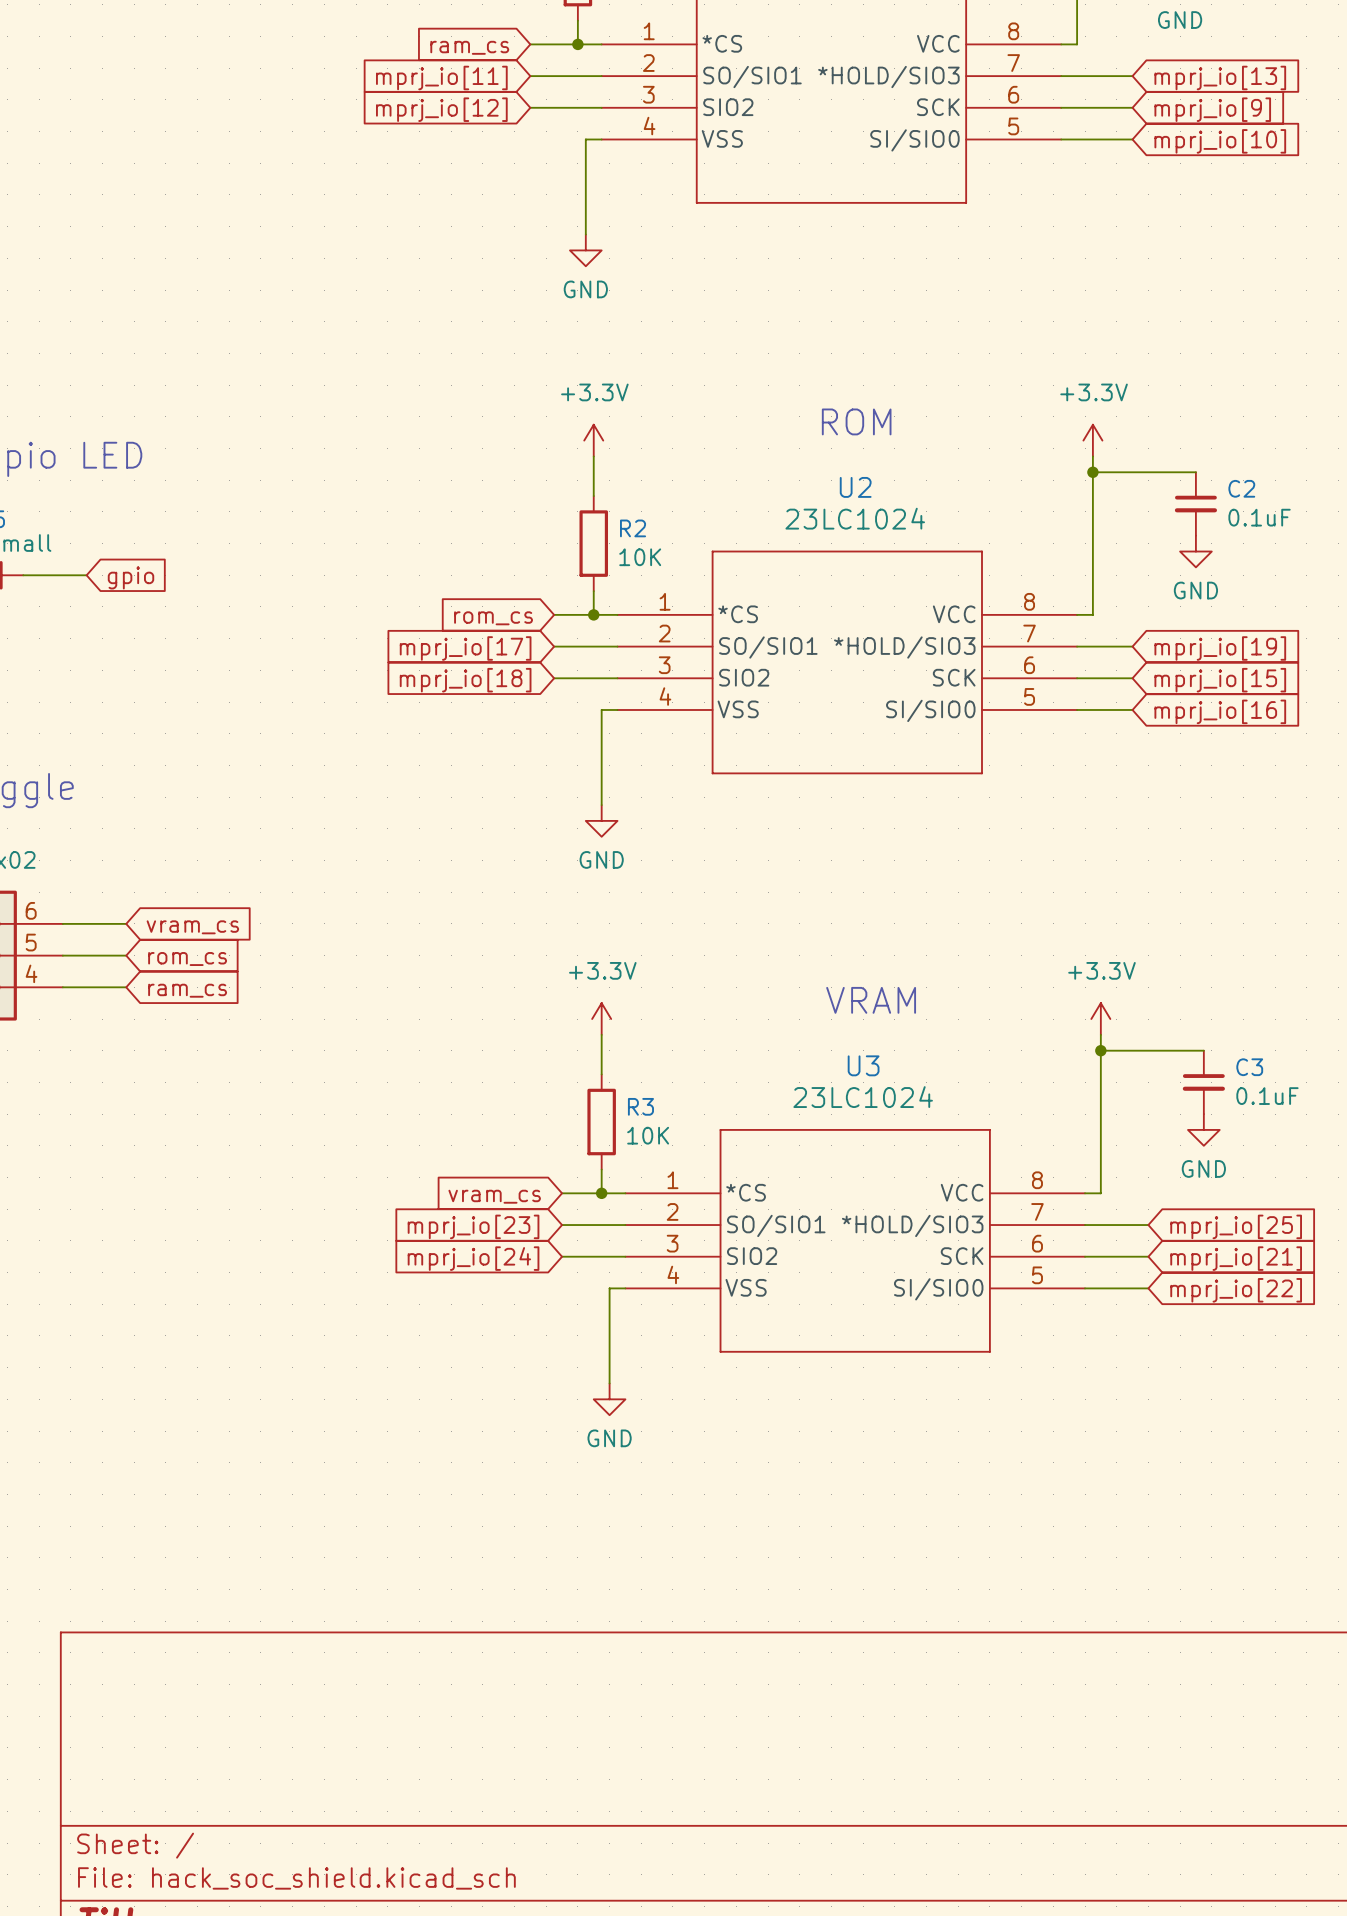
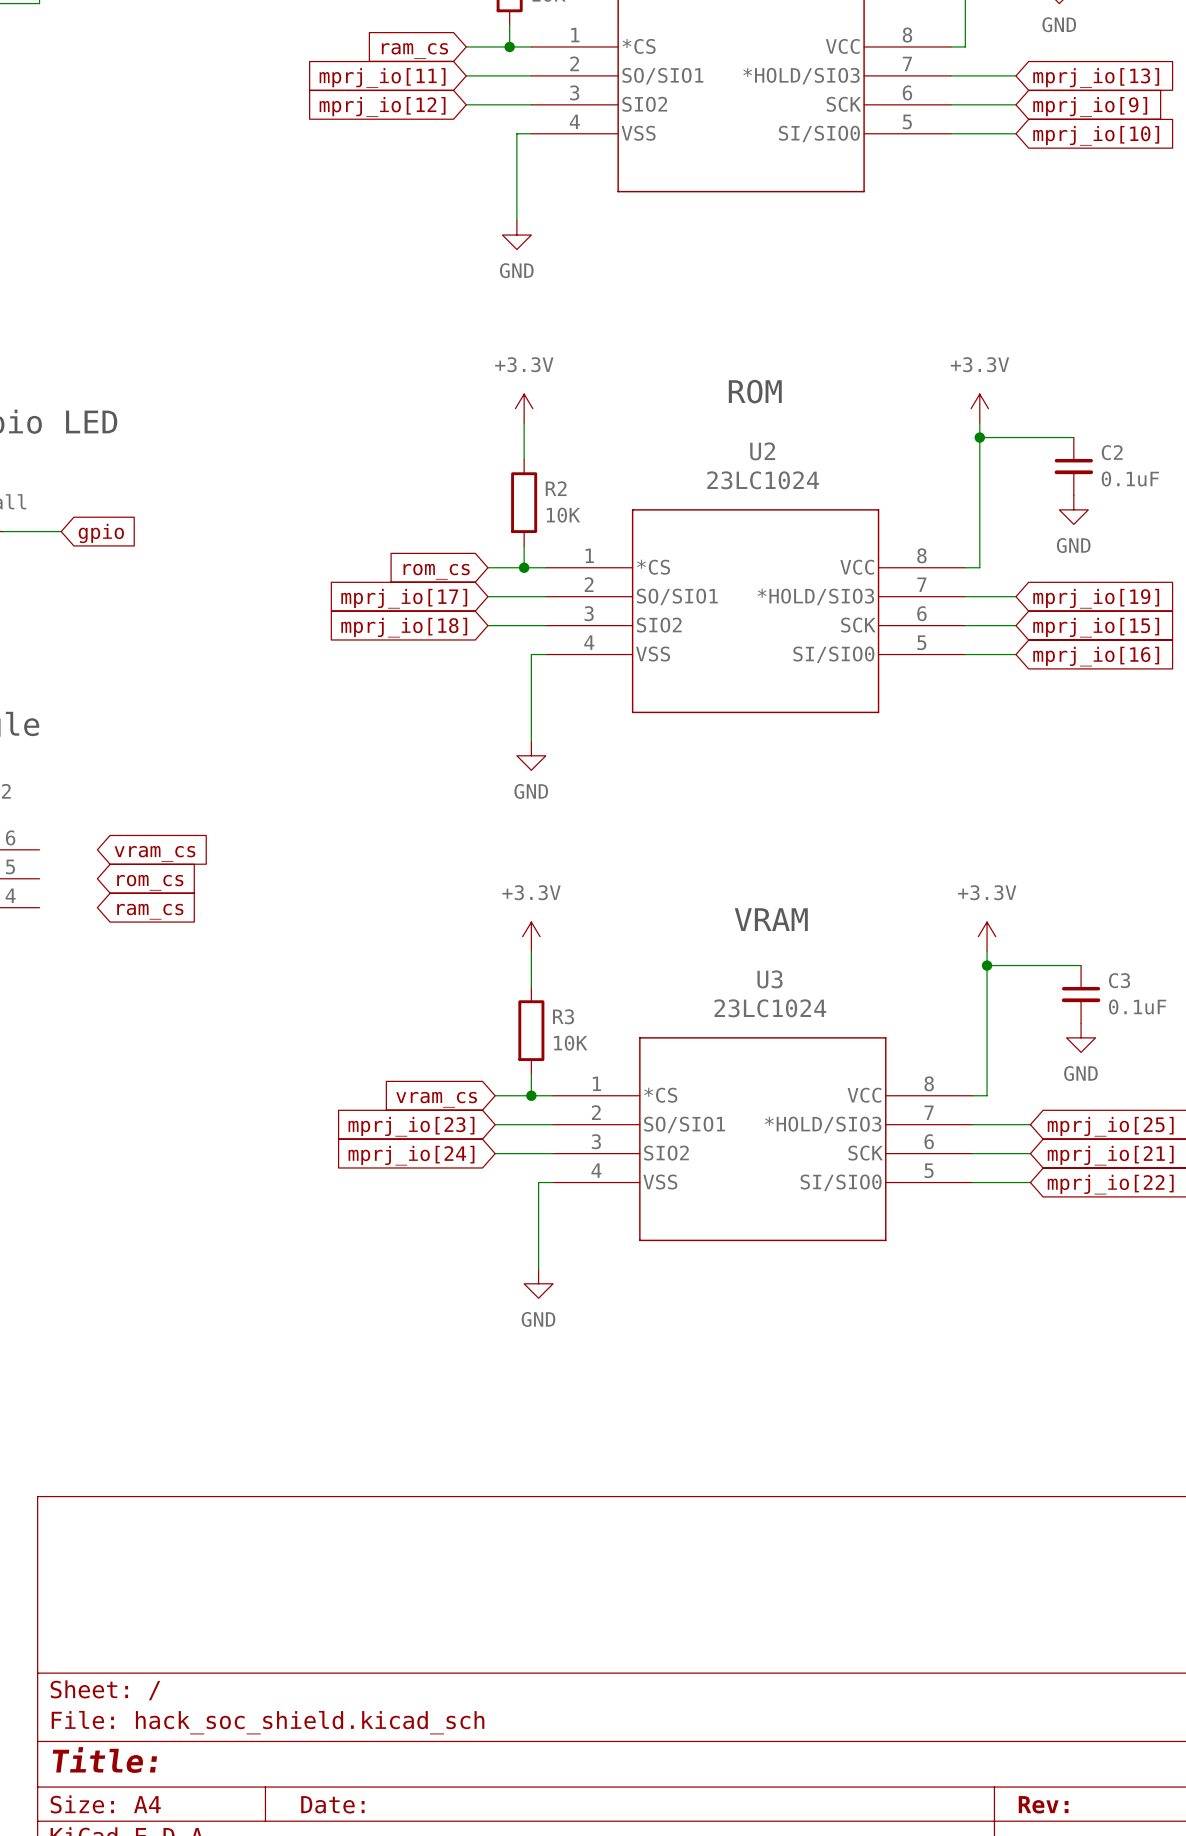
wire: (62, 923) (126, 923) -> none
wire: (62, 955) (126, 955) -> none
wire: (62, 987) (126, 987) -> none

